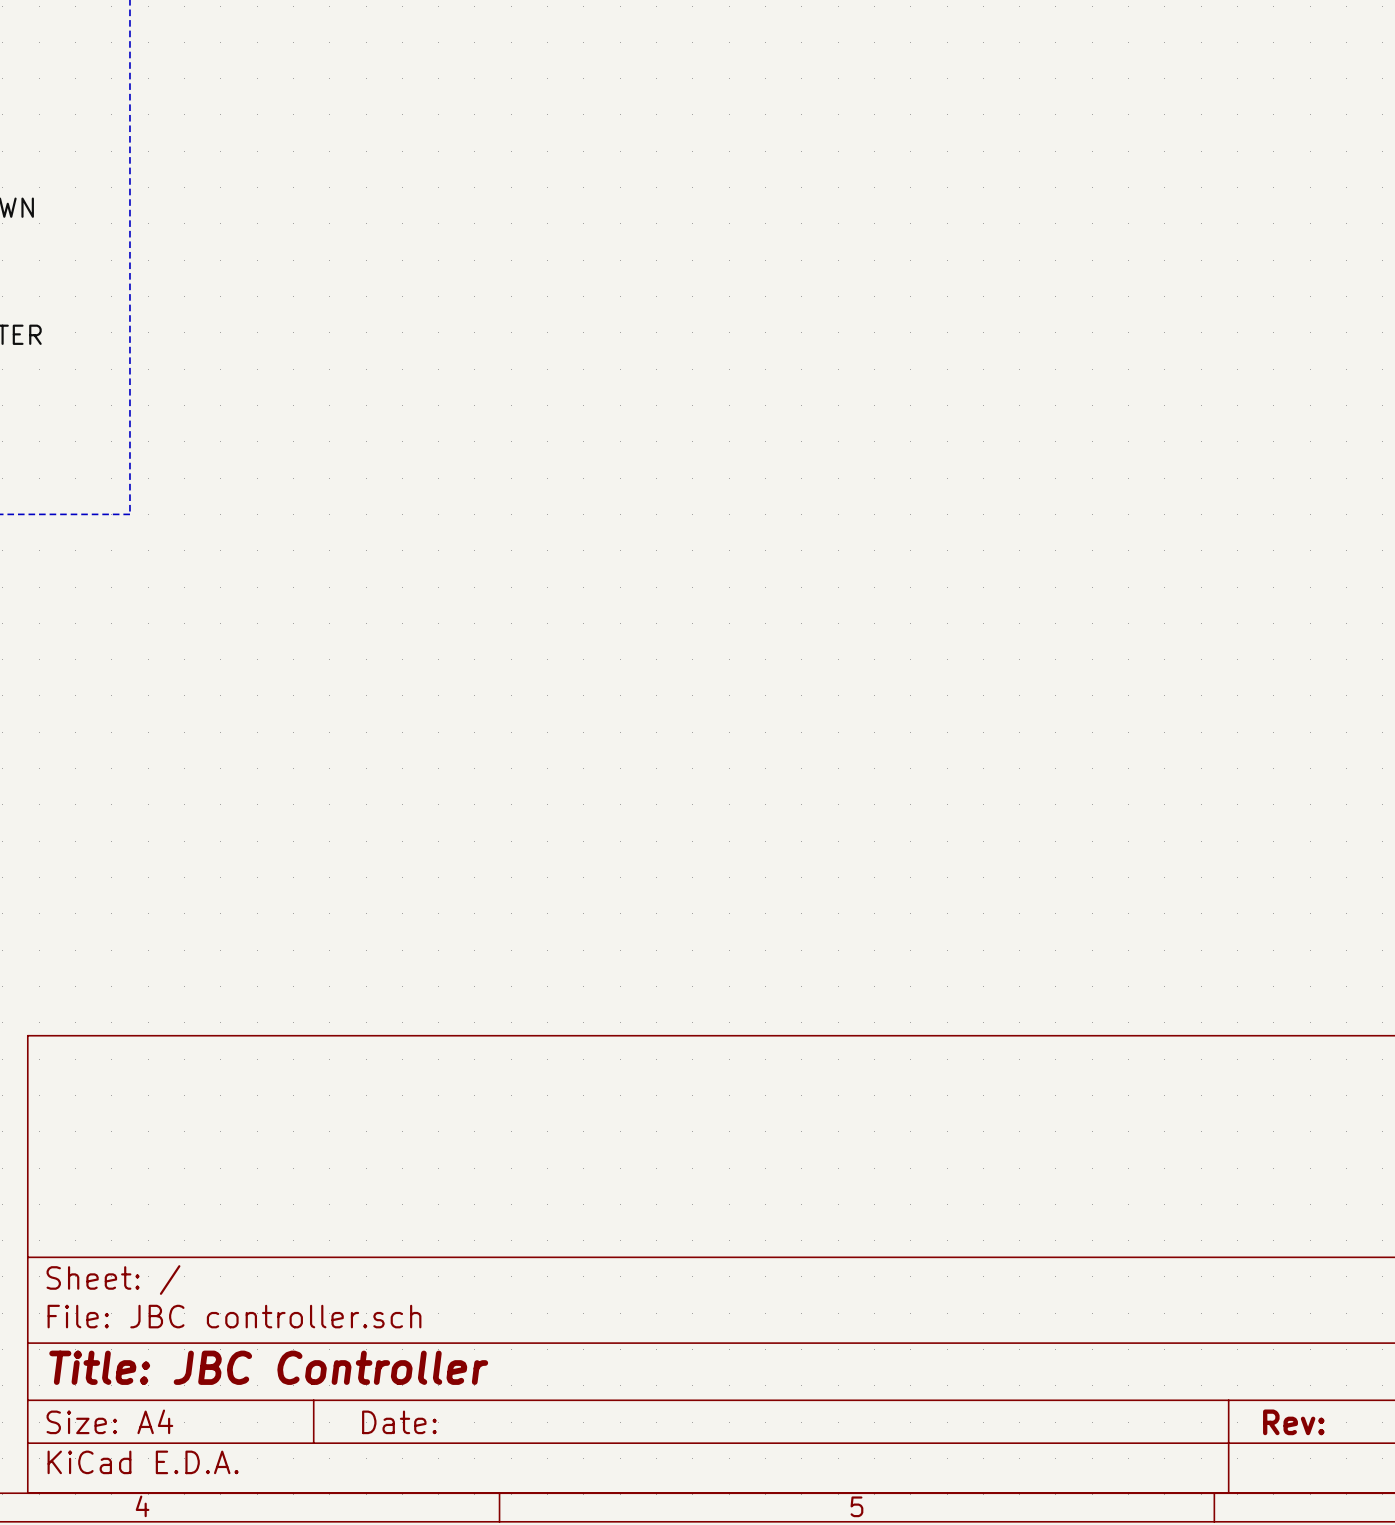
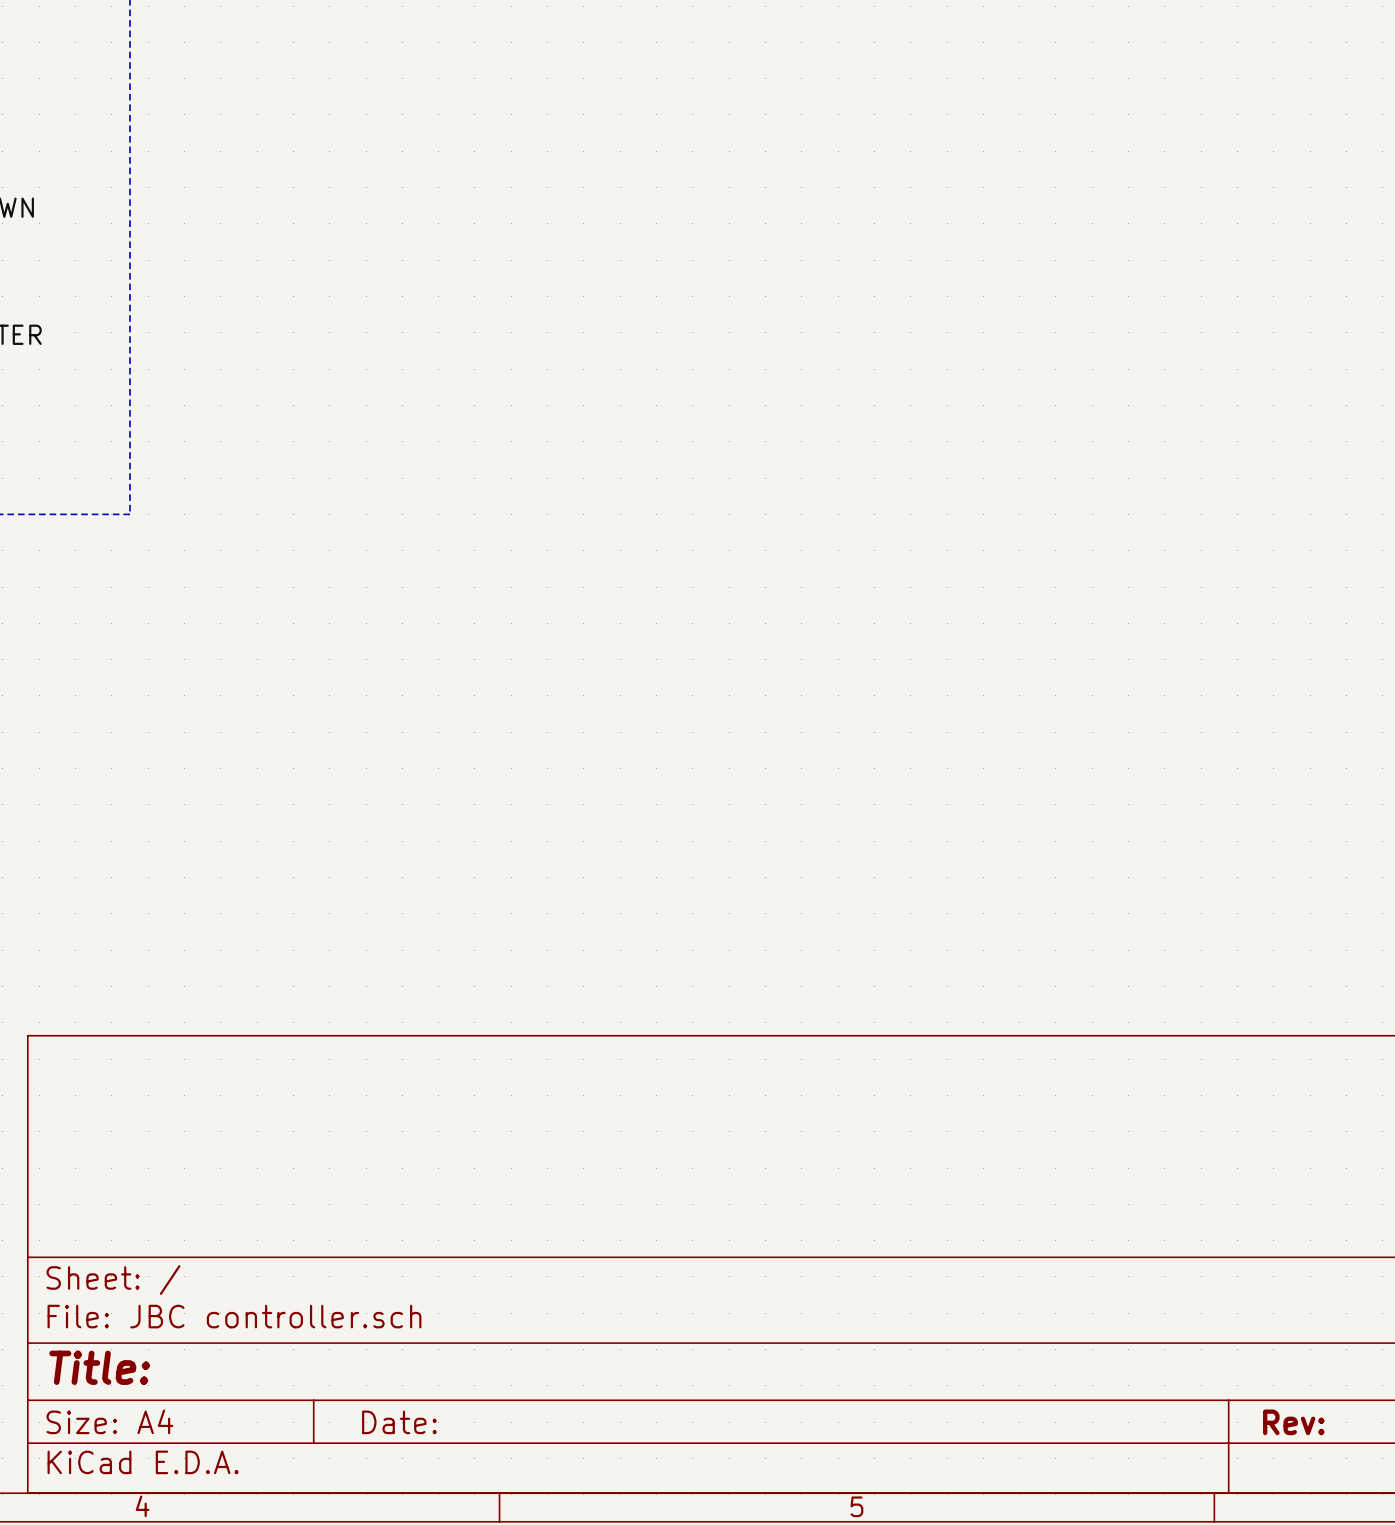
title block: Title: JBC Controller (268, 1367) -> Title: (99, 1367)

